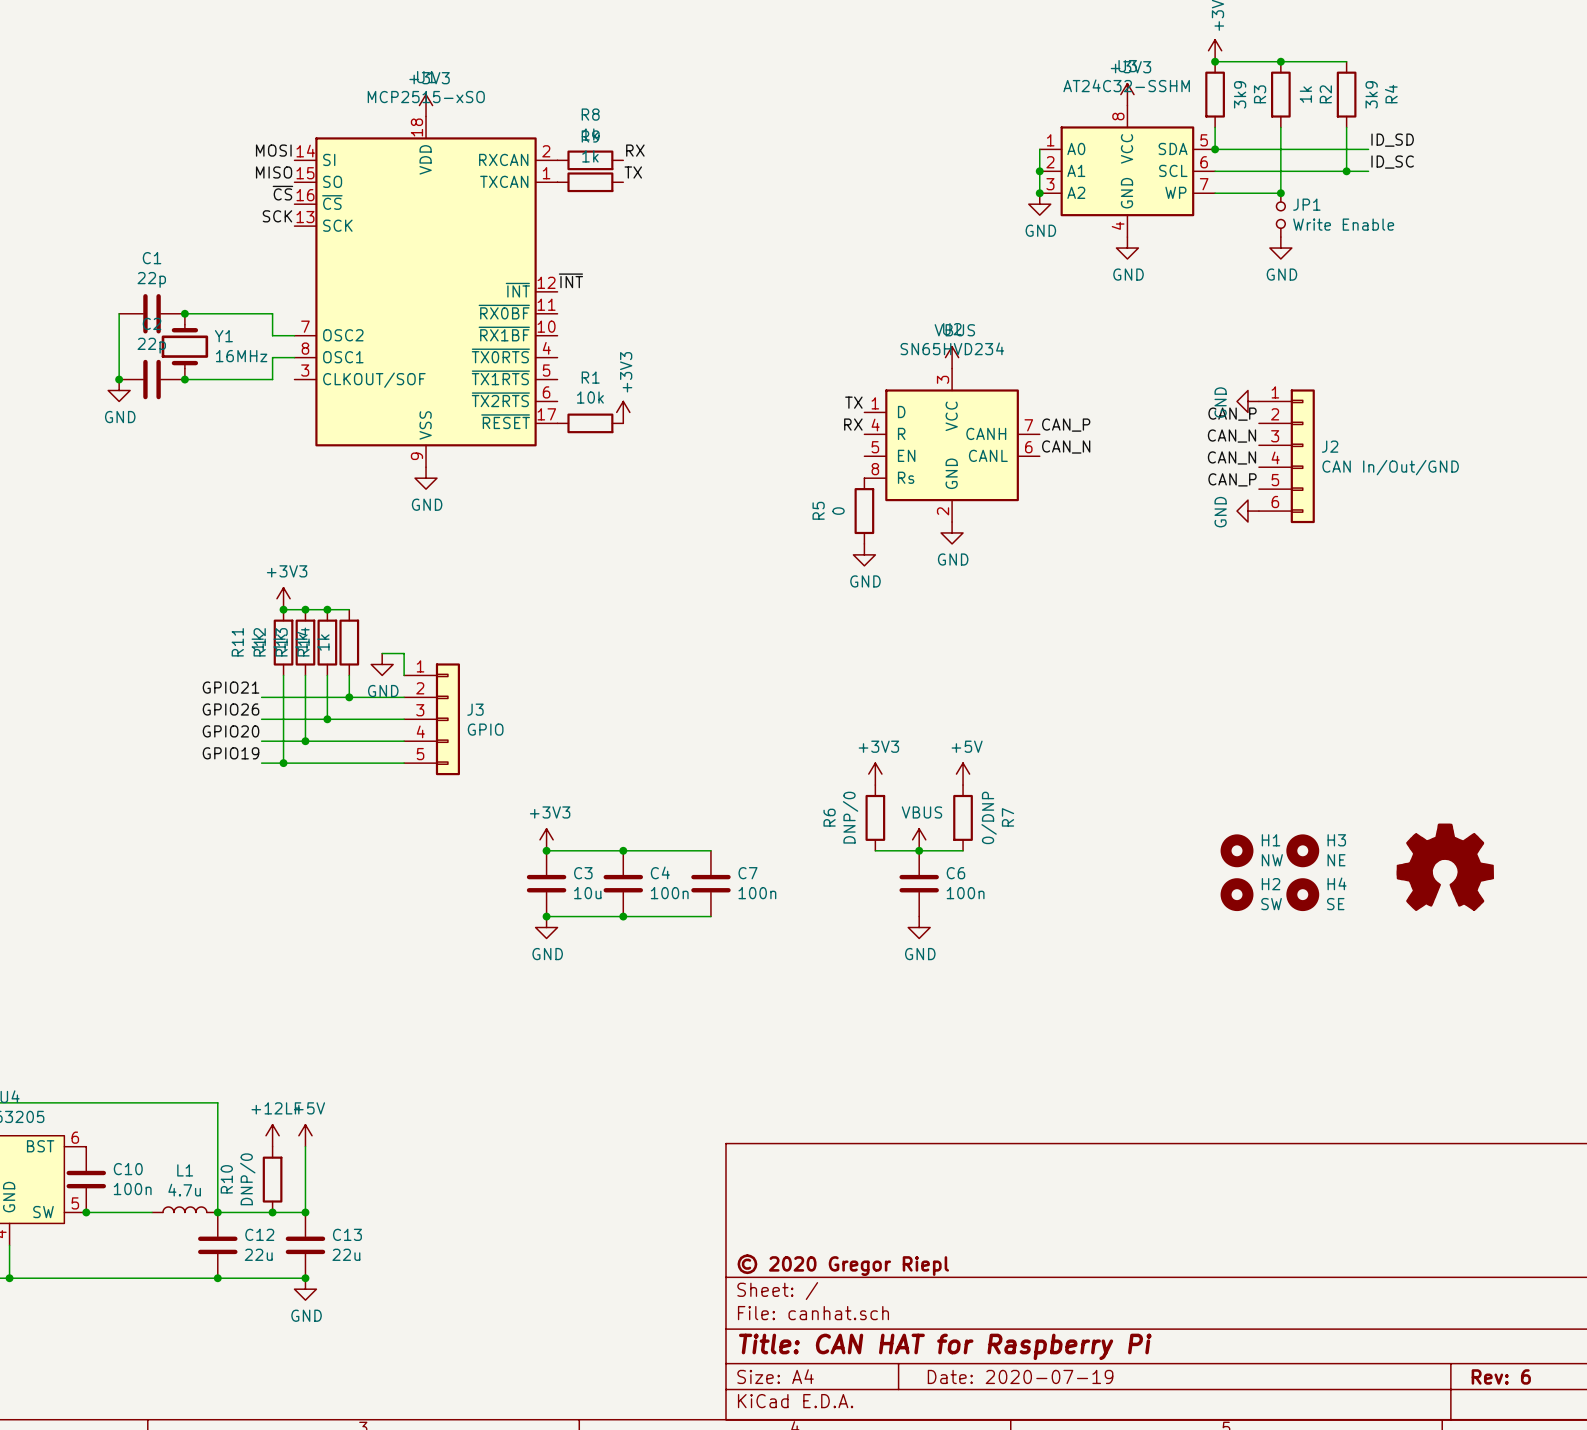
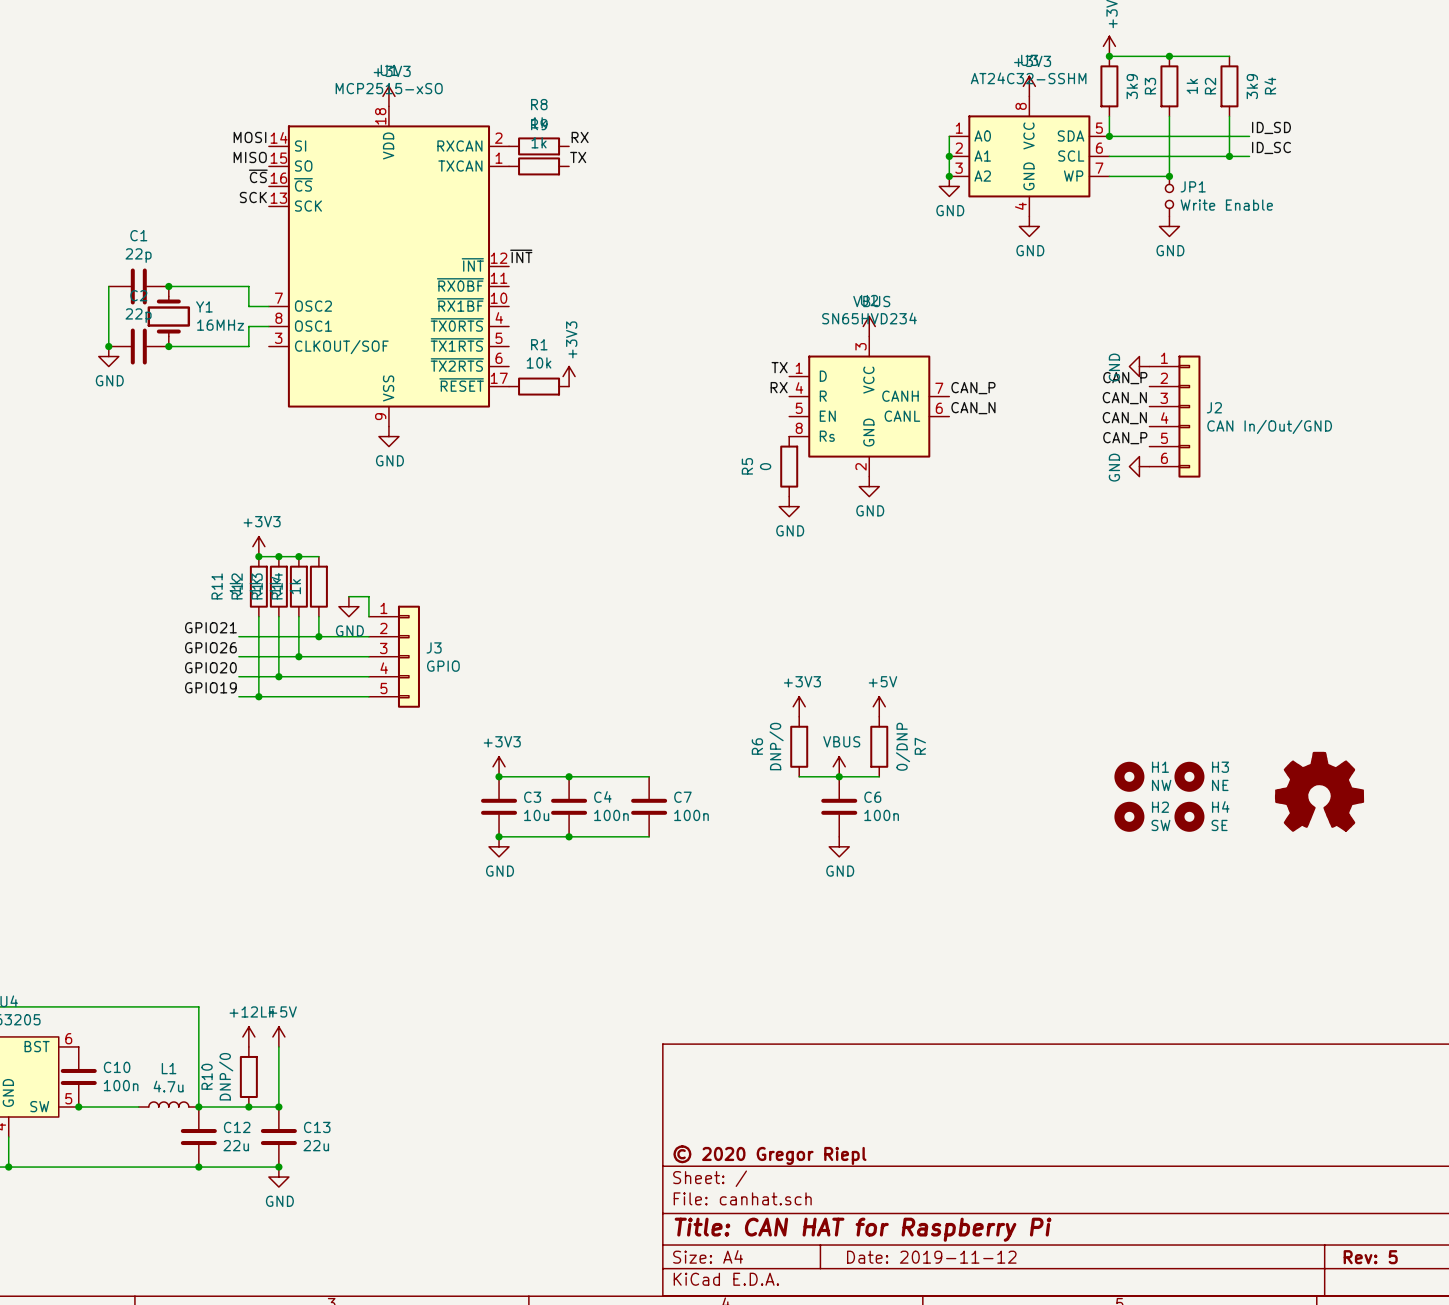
title block: Date: 2020-07-19 (1020, 1376) -> Date: 2019-11-12 (931, 1257)
title block: Rev: 6 (1501, 1376) -> Rev: 5 (1370, 1257)

